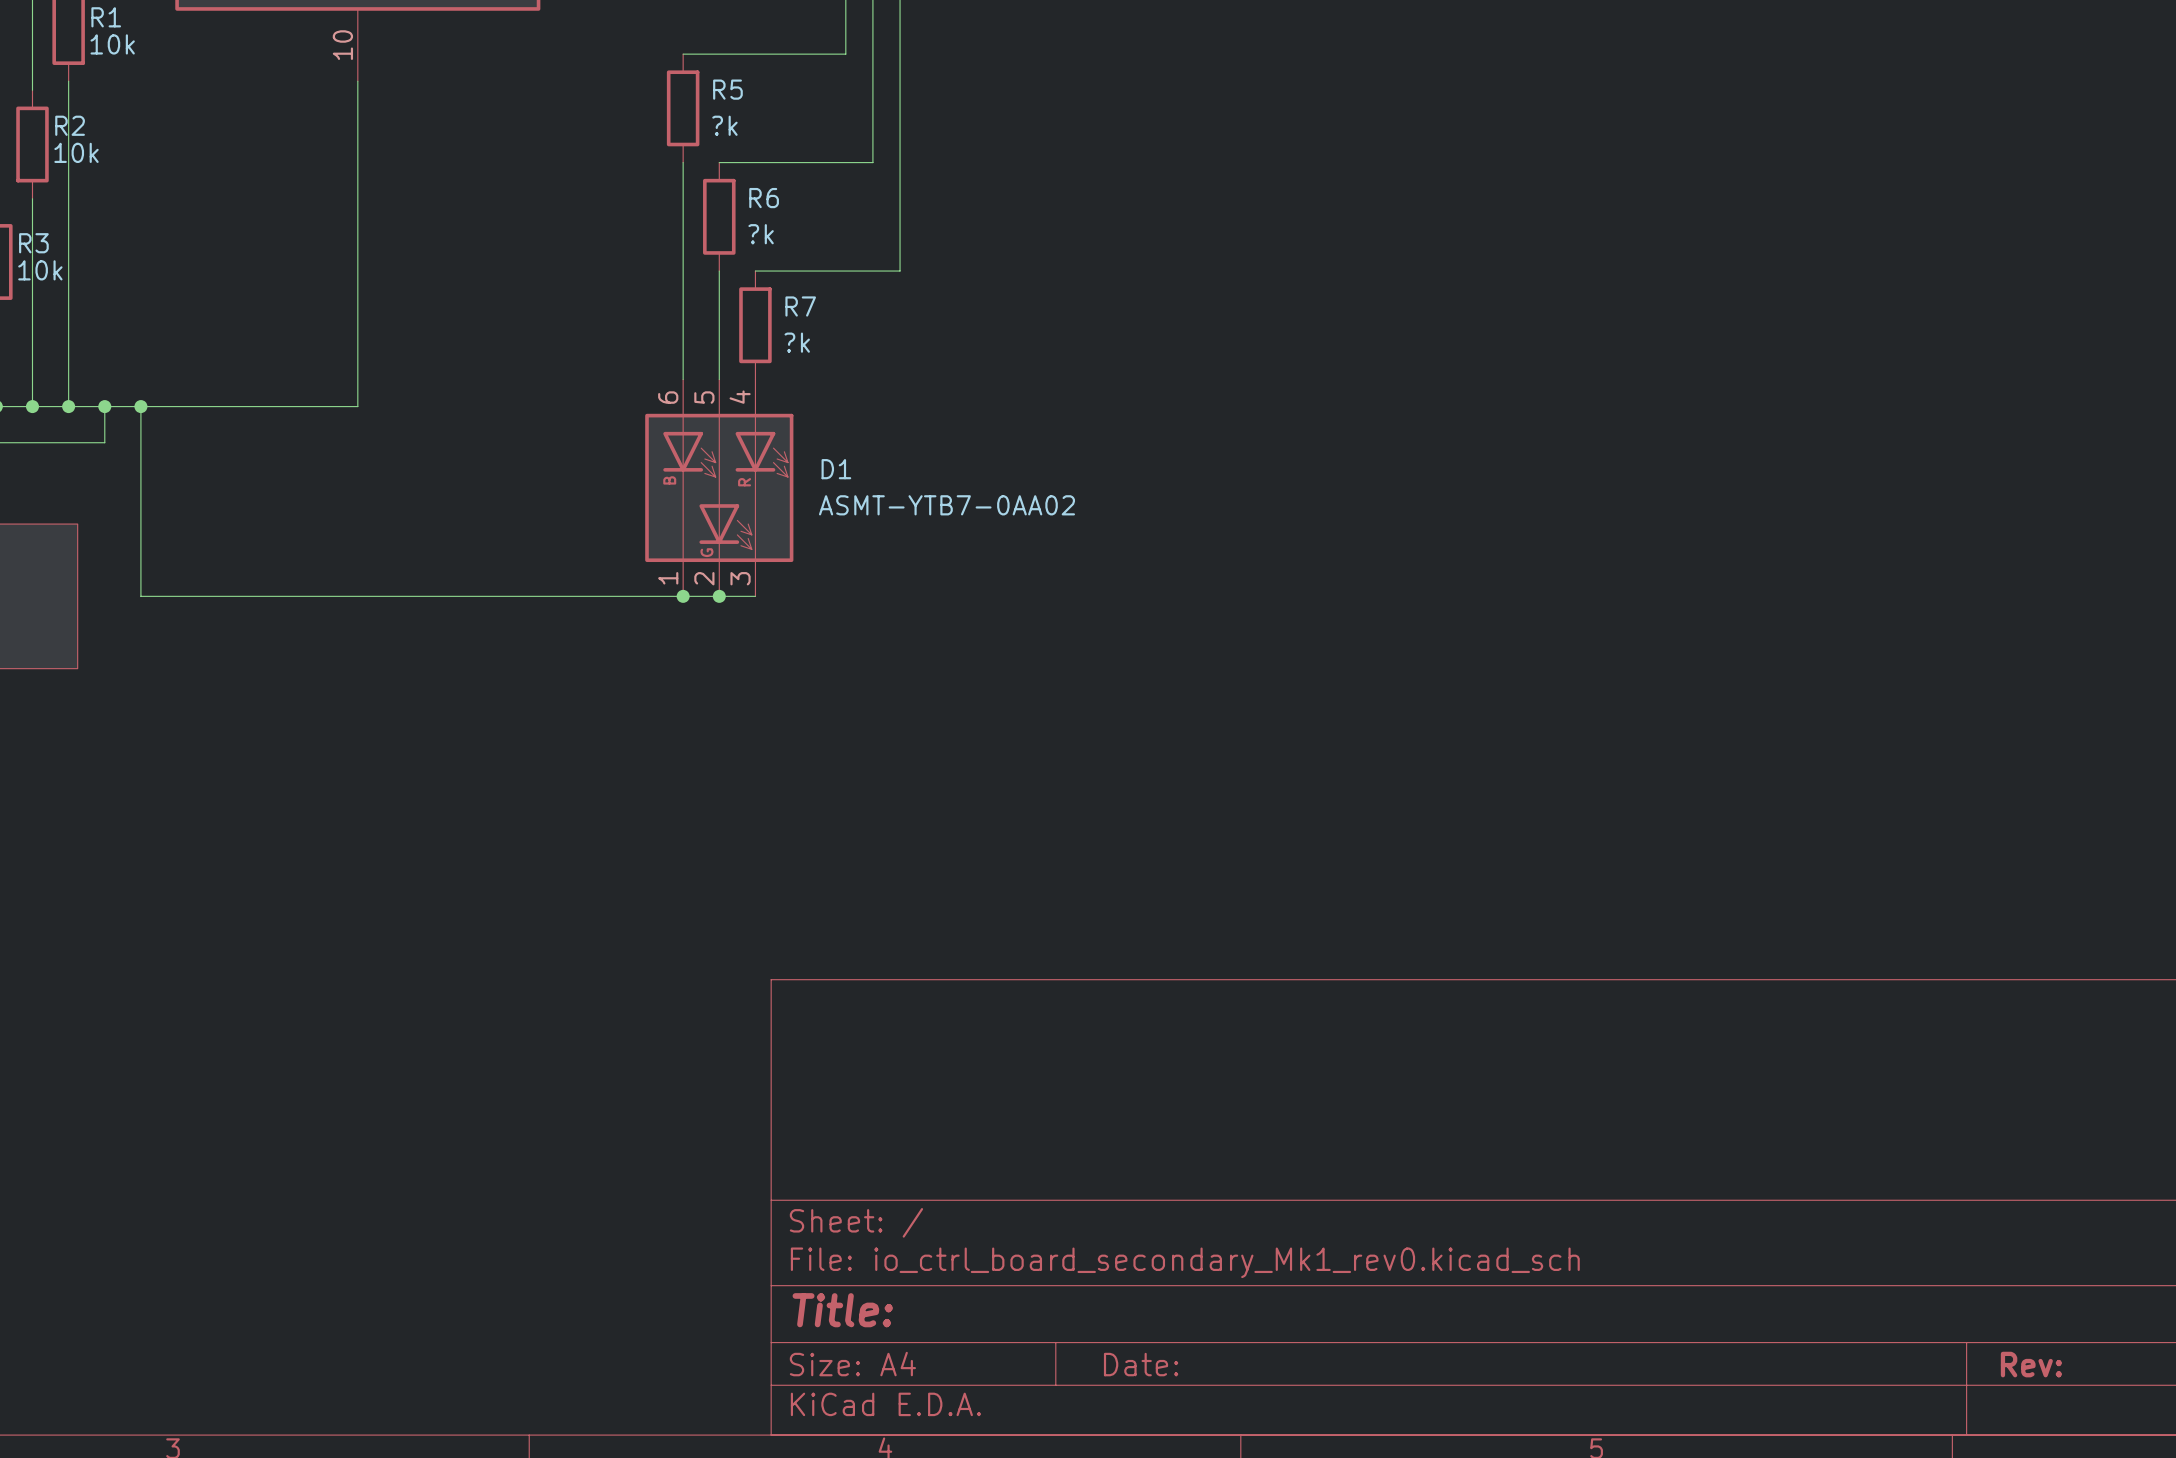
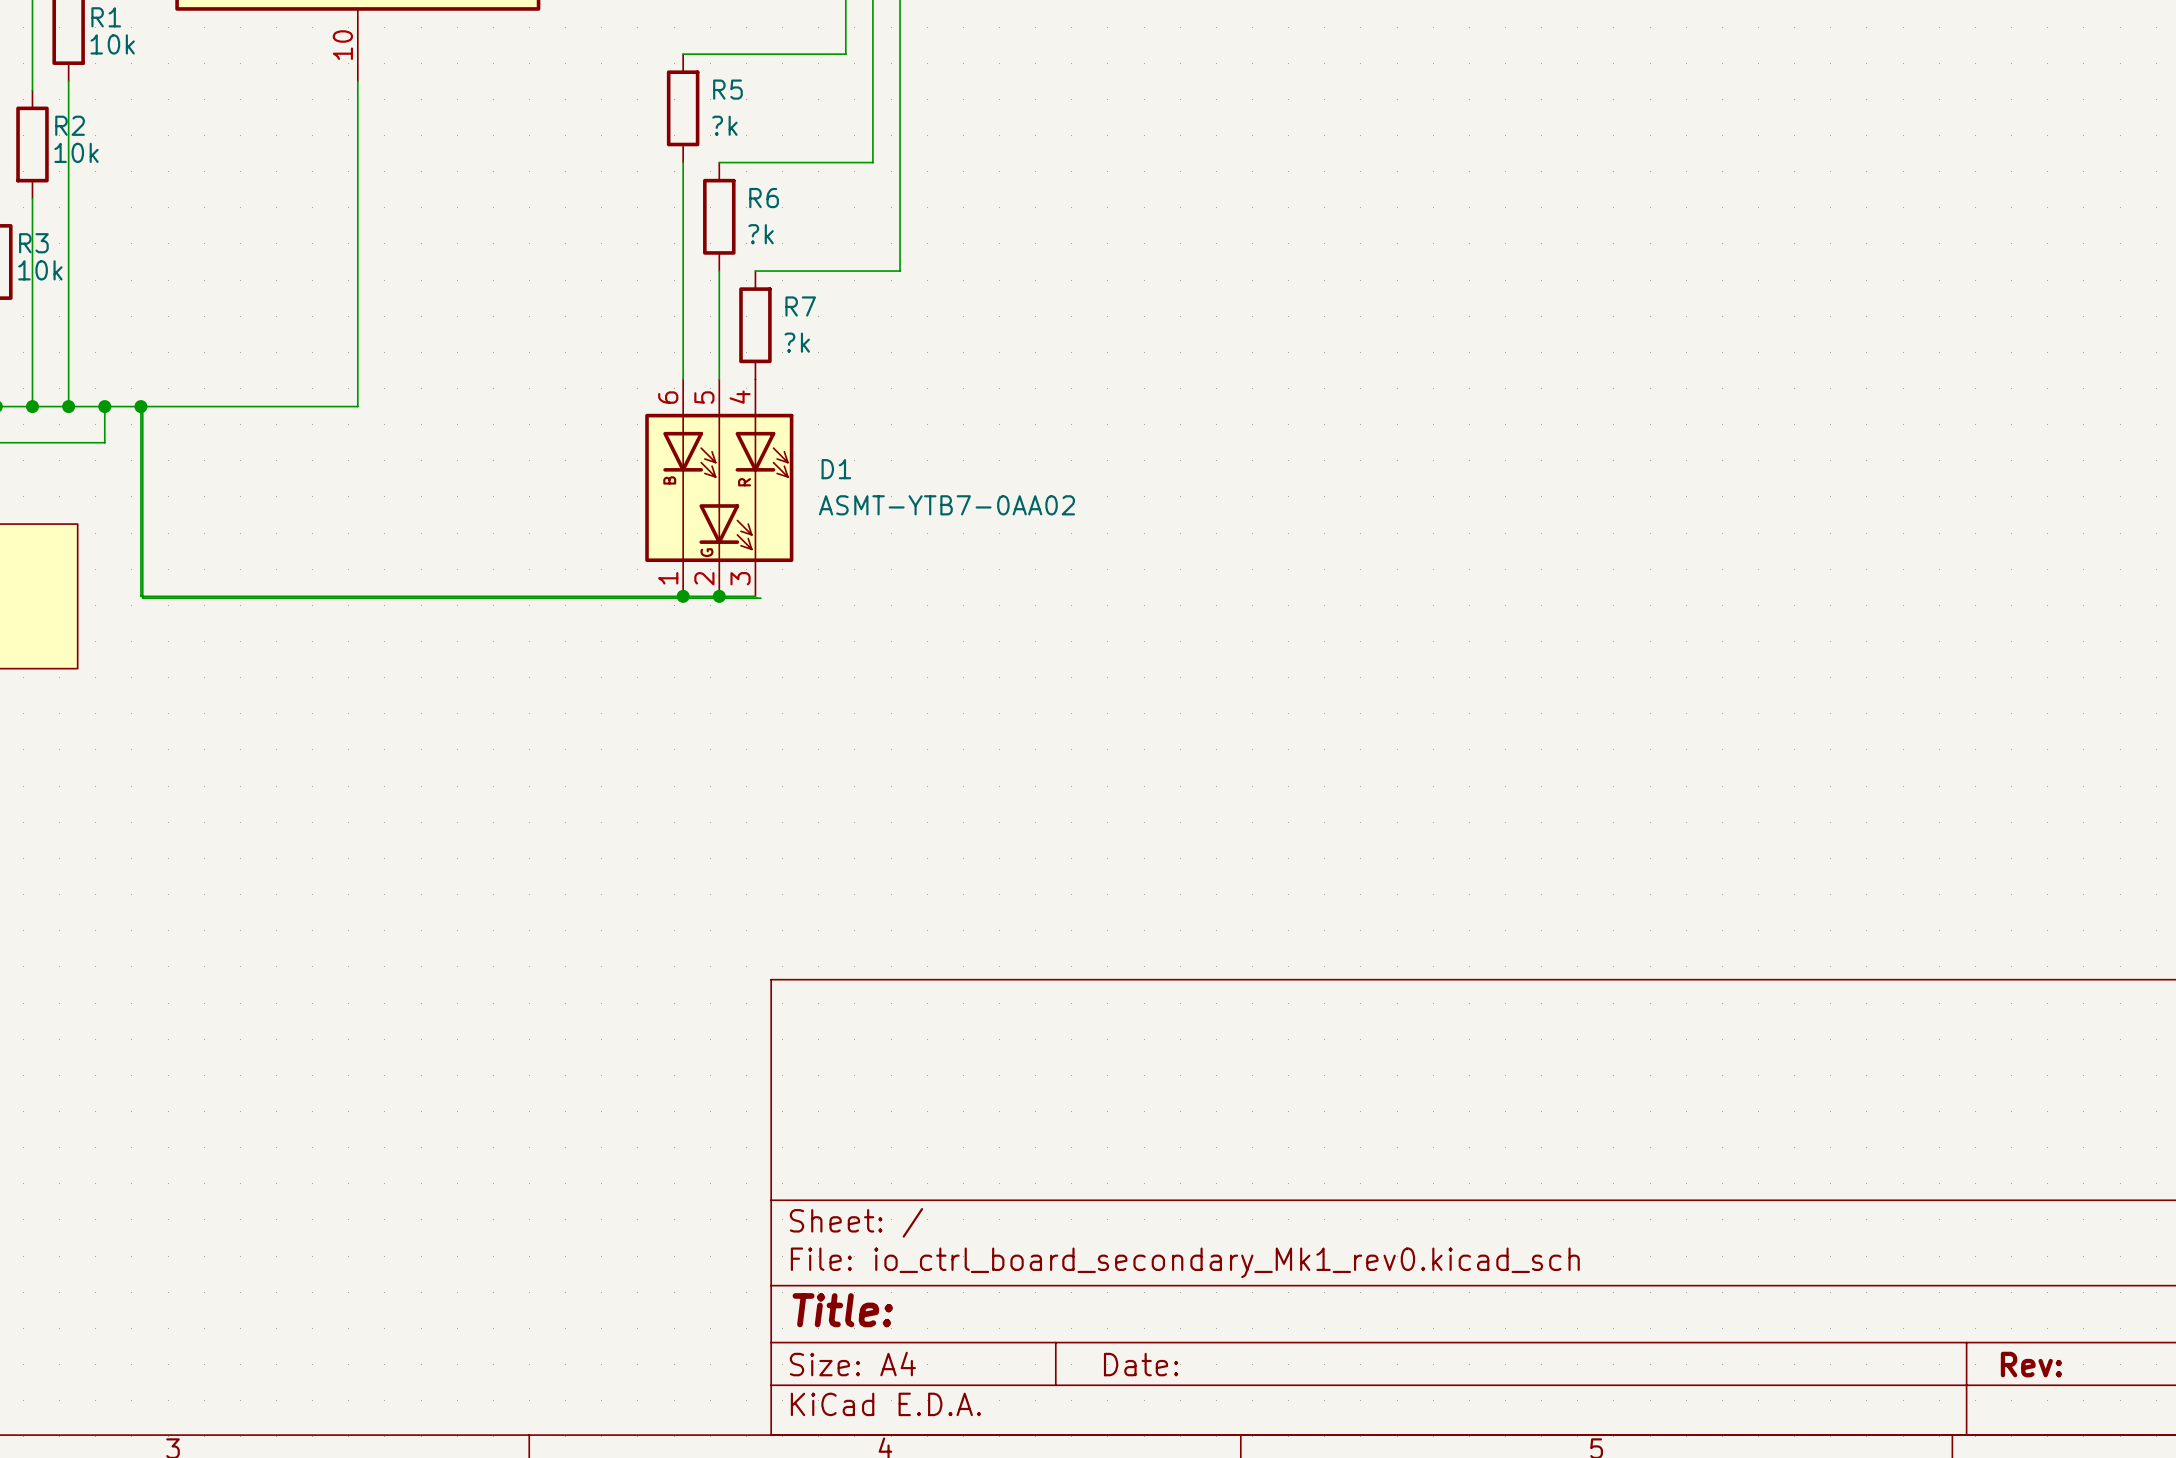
wire: none -> (142, 406) (142, 598) (760, 598)

